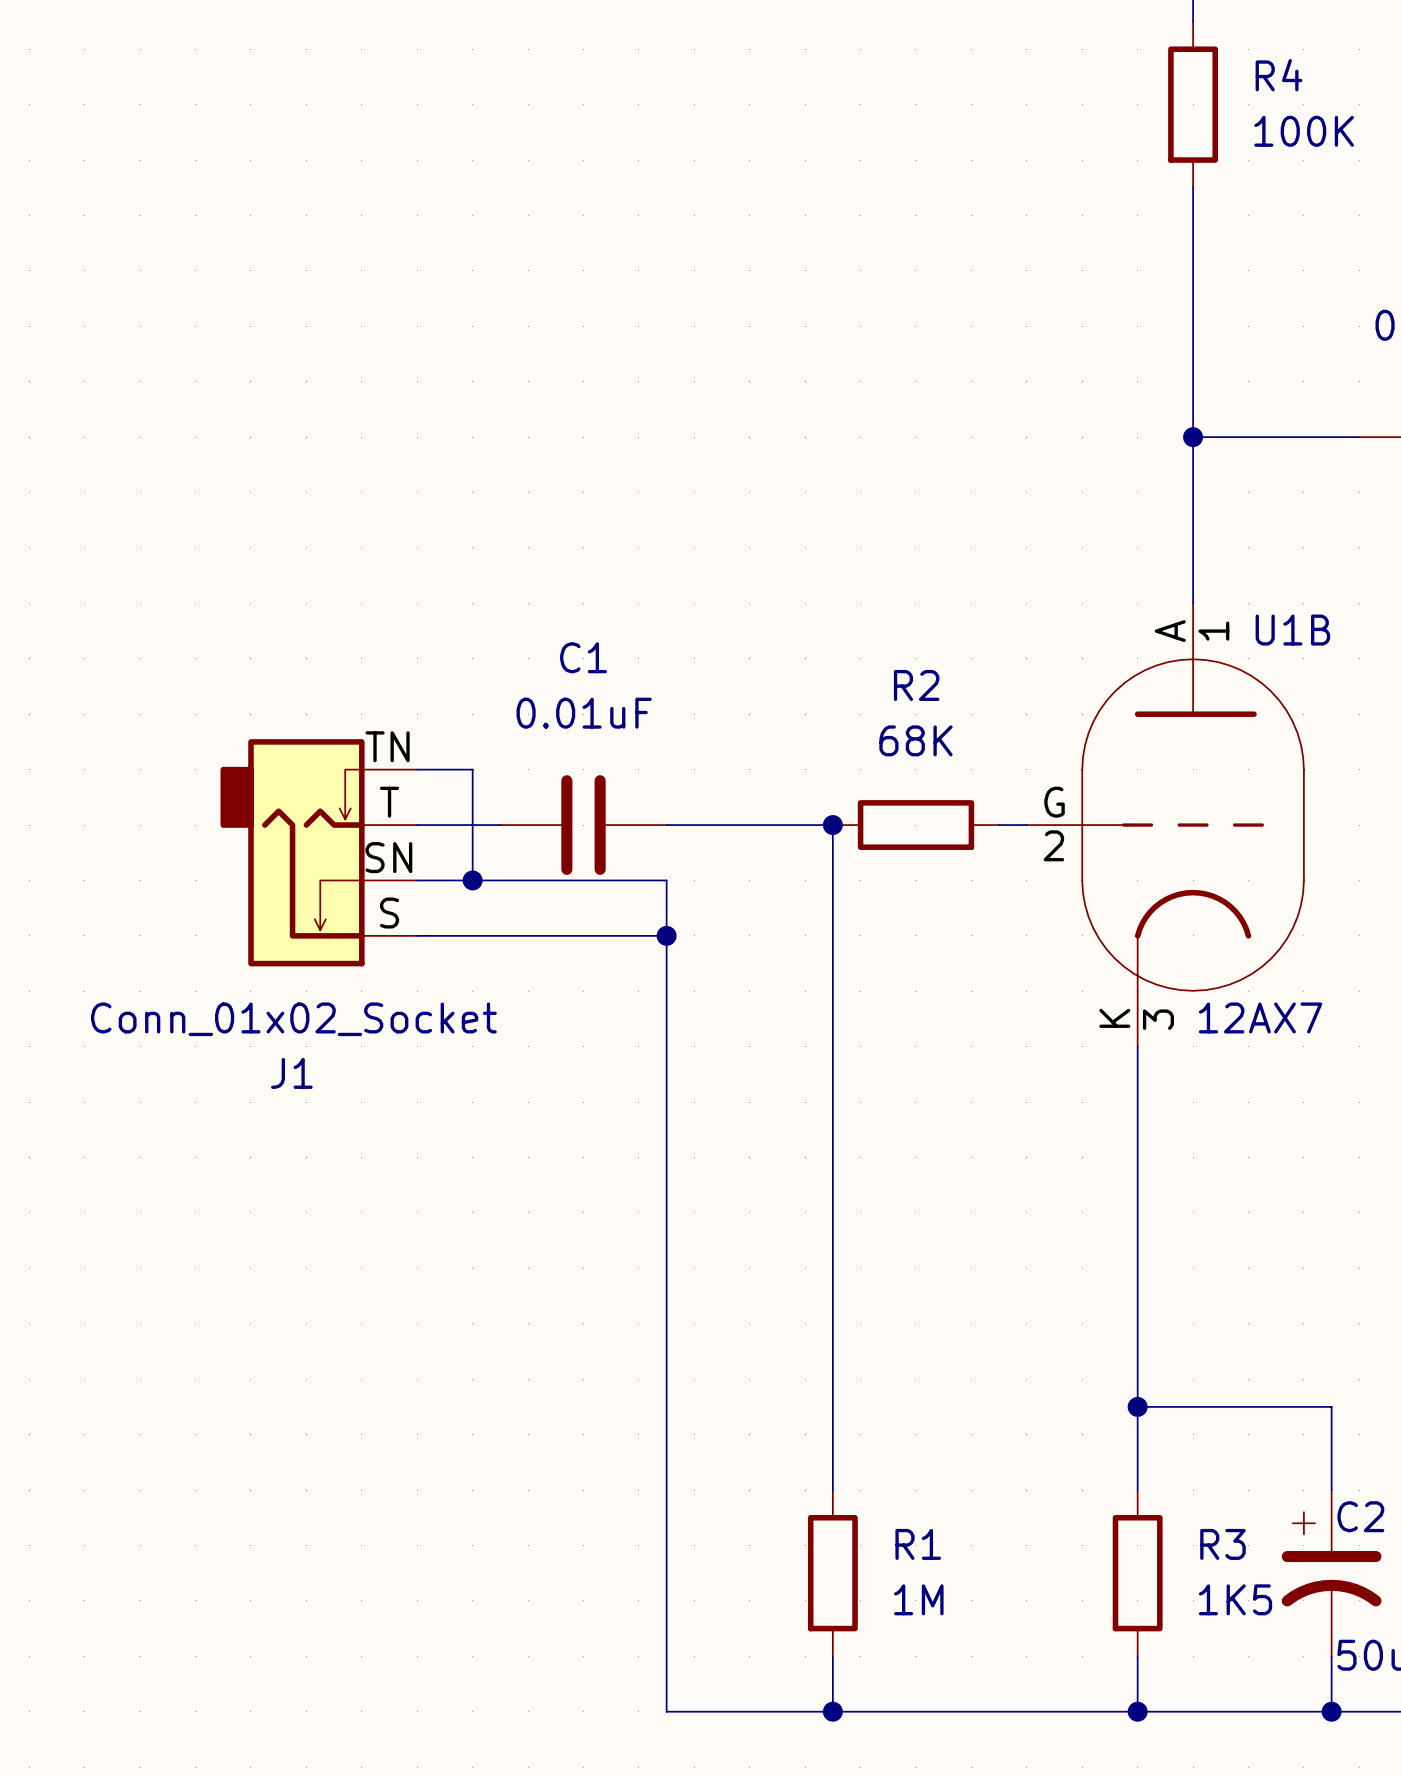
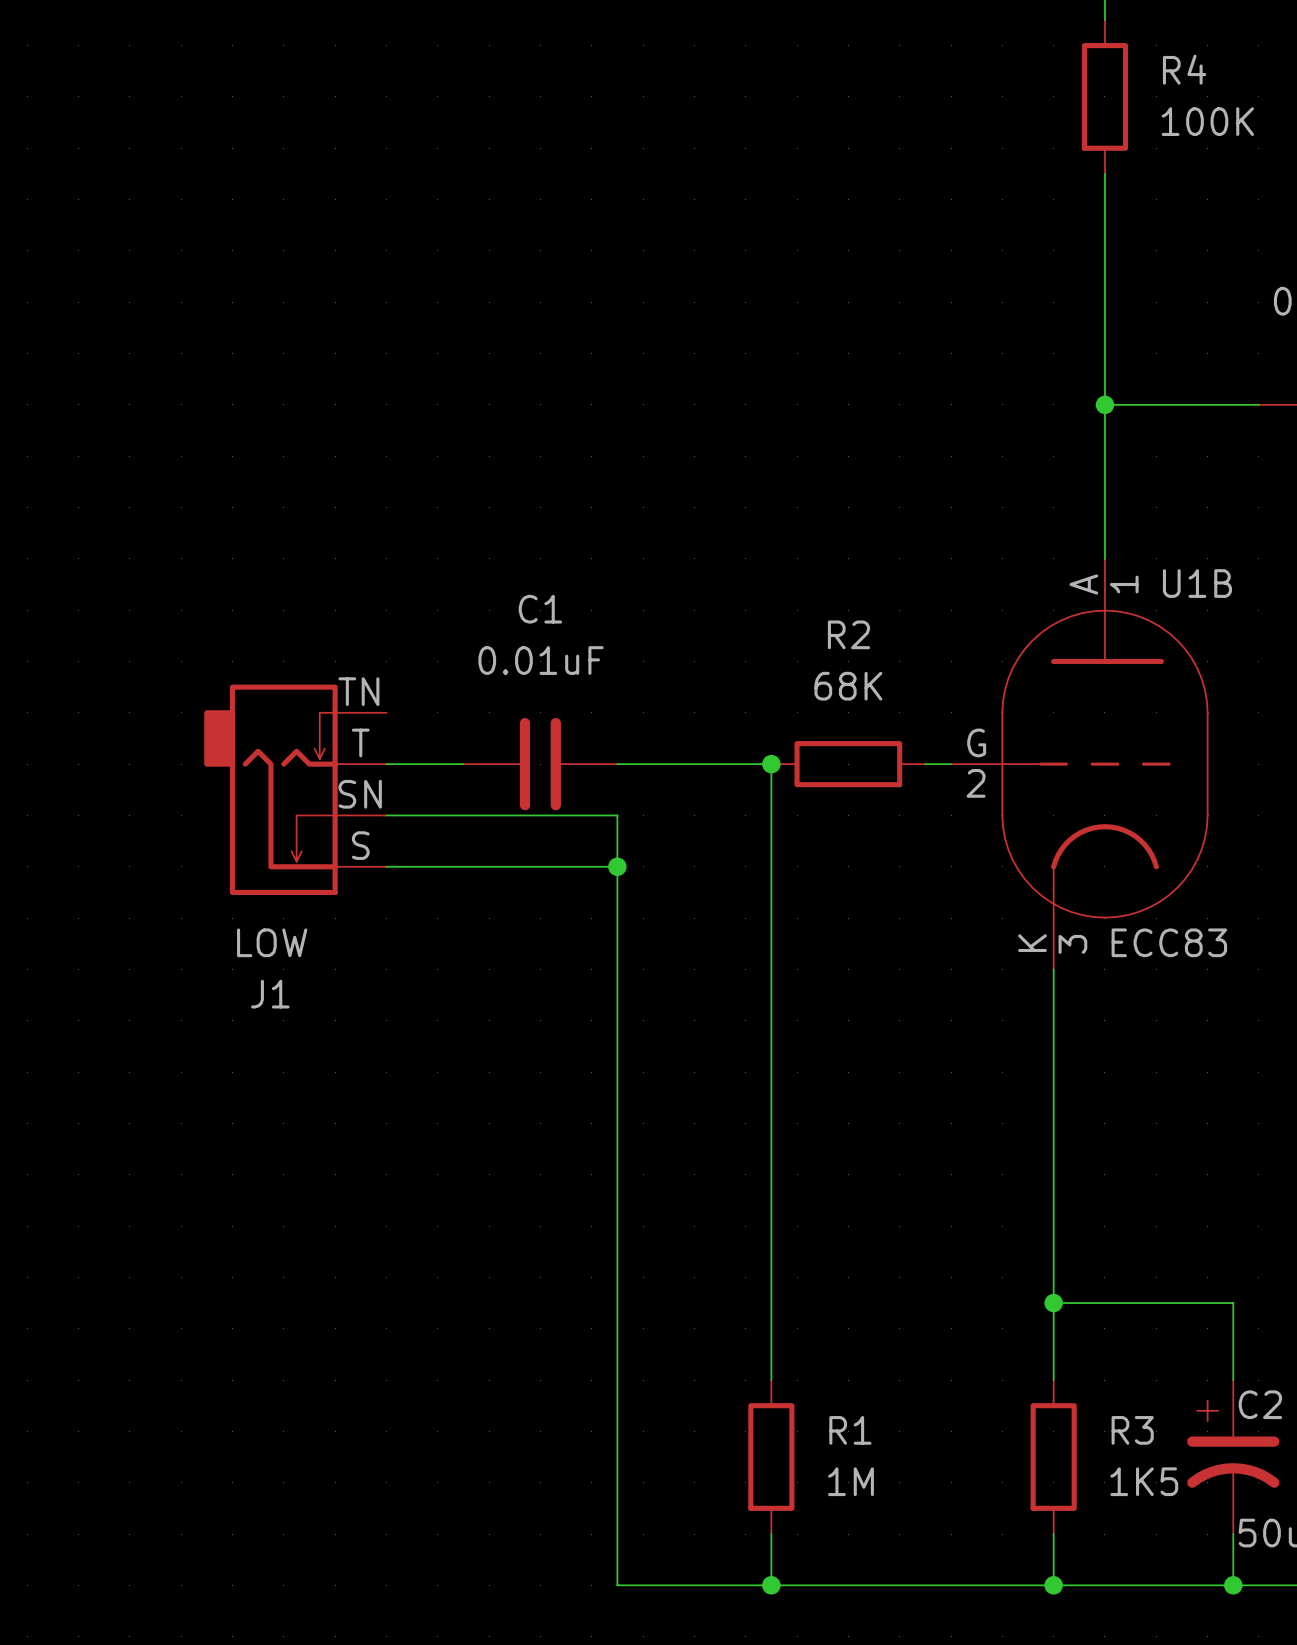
wire: (417, 769) (472, 769) (472, 880) -> none
junction: (472, 880) -> none
U1B value: 12AX7 (1260, 1017) -> ECC83 (1169, 942)
J1 value: Conn_01x02_Socket (293, 1019) -> LOW (272, 942)

